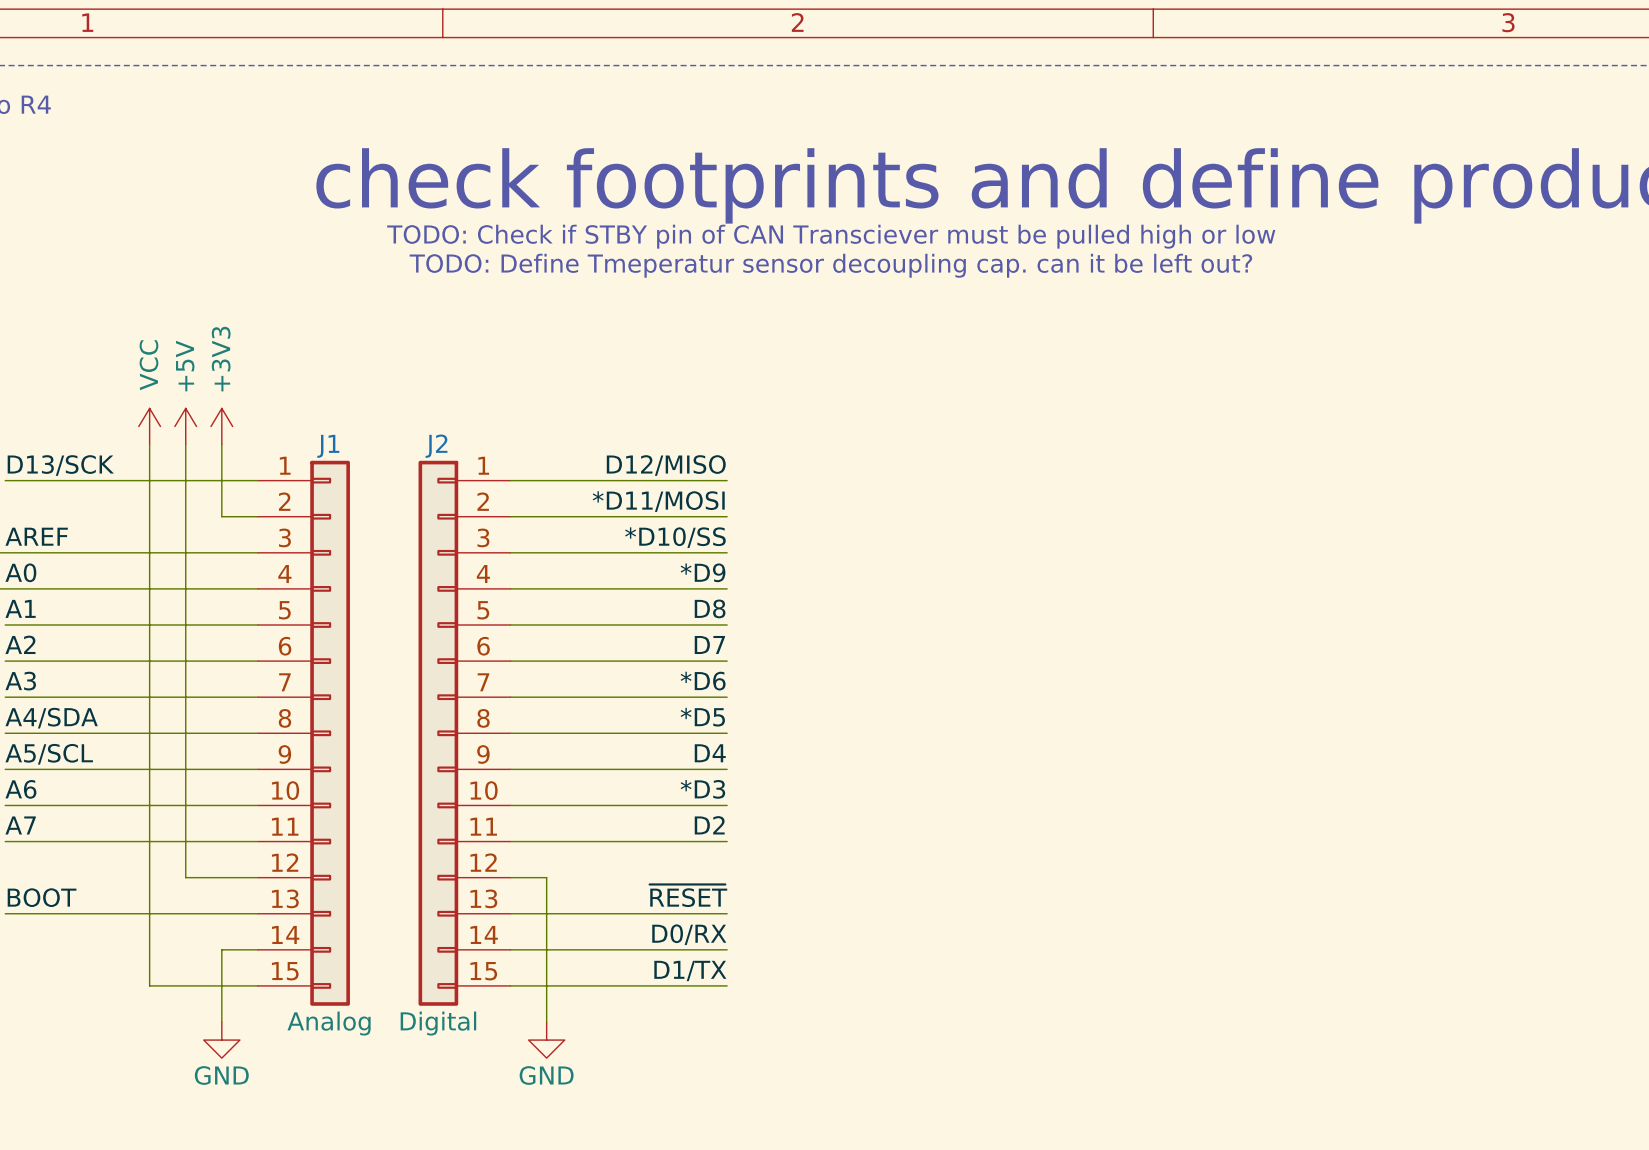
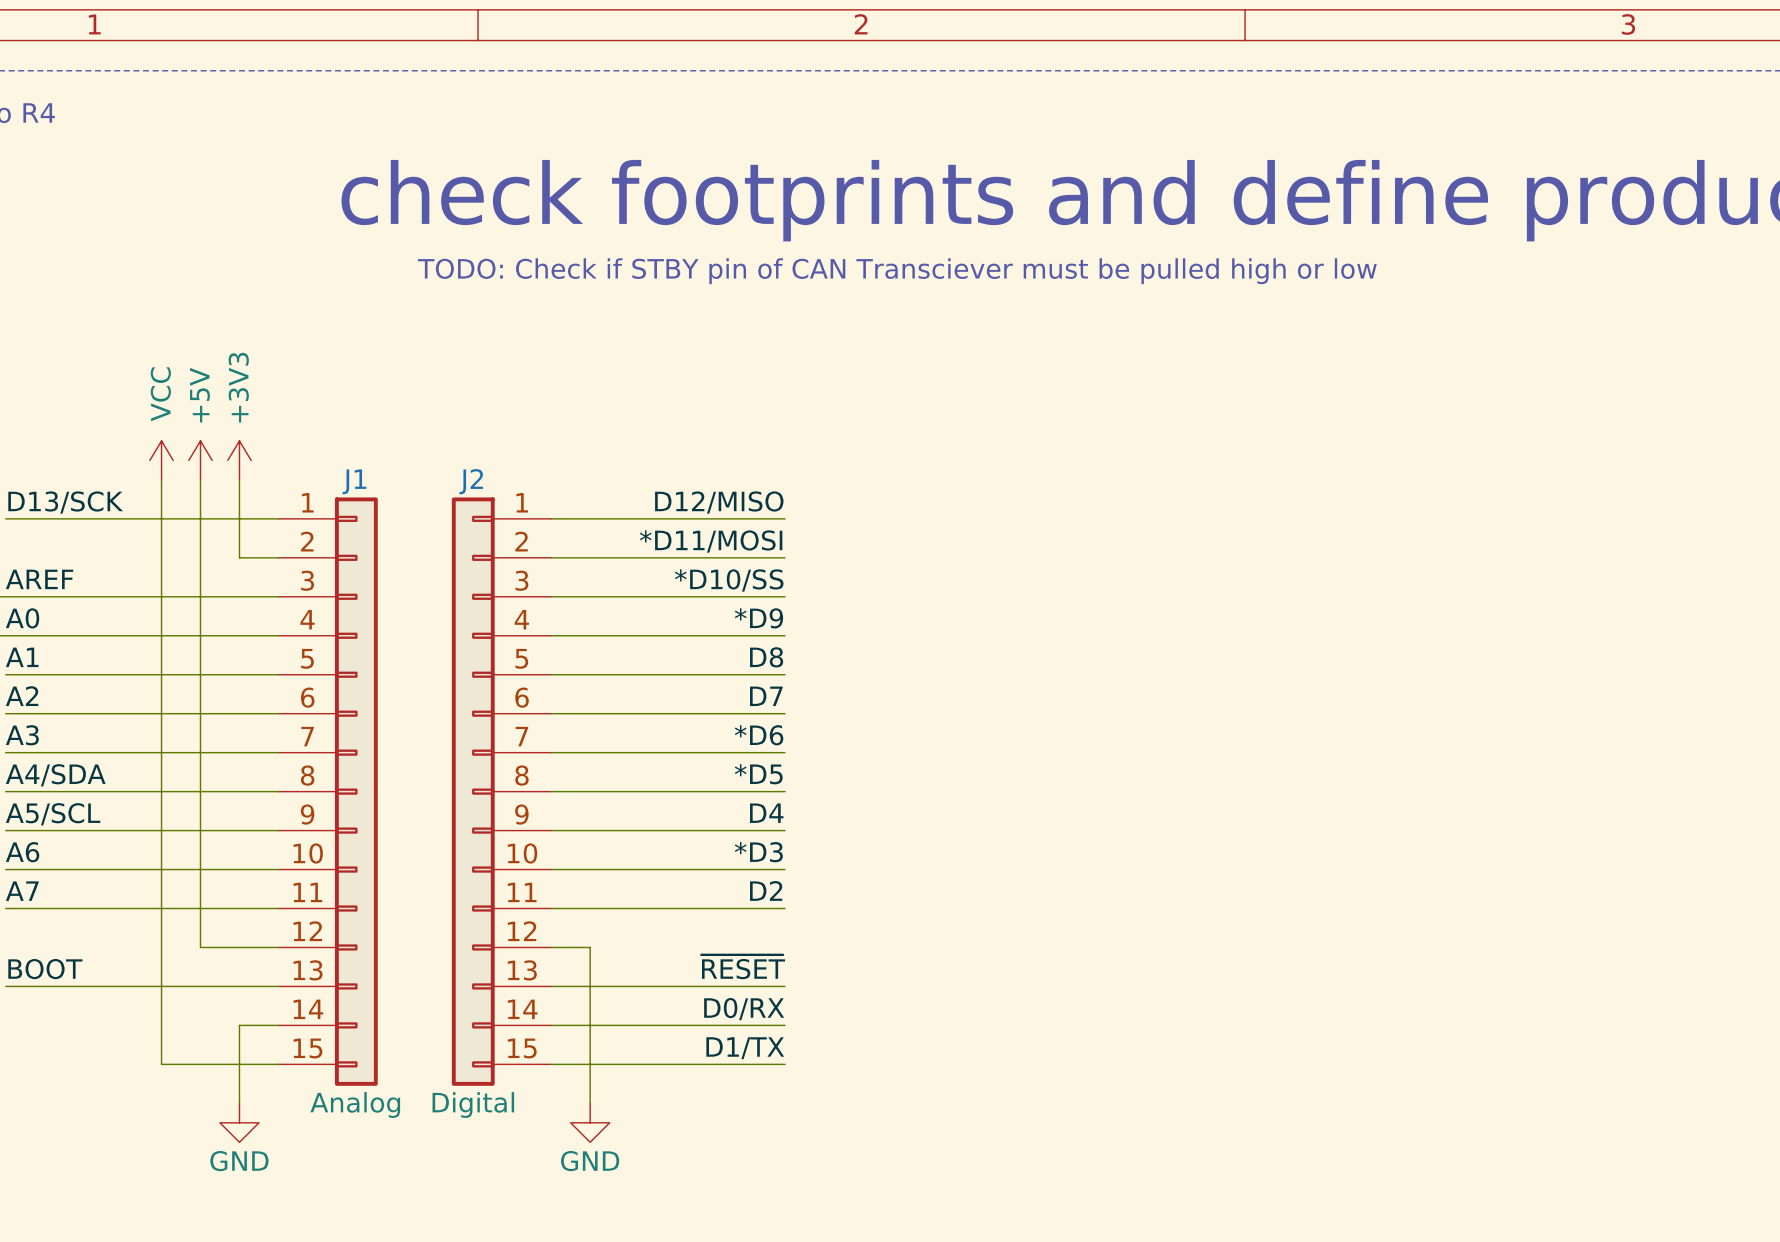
text position: TODO: Check if STBY pin of CAN Transciever must be pulled high or low (831, 236) -> TODO: Check if STBY pin of CAN Transciever must be pulled high or low (897, 271)
text: TODO: Define Tmeperatur sensor decoupling cap. can it be left out? (830, 265) -> none

